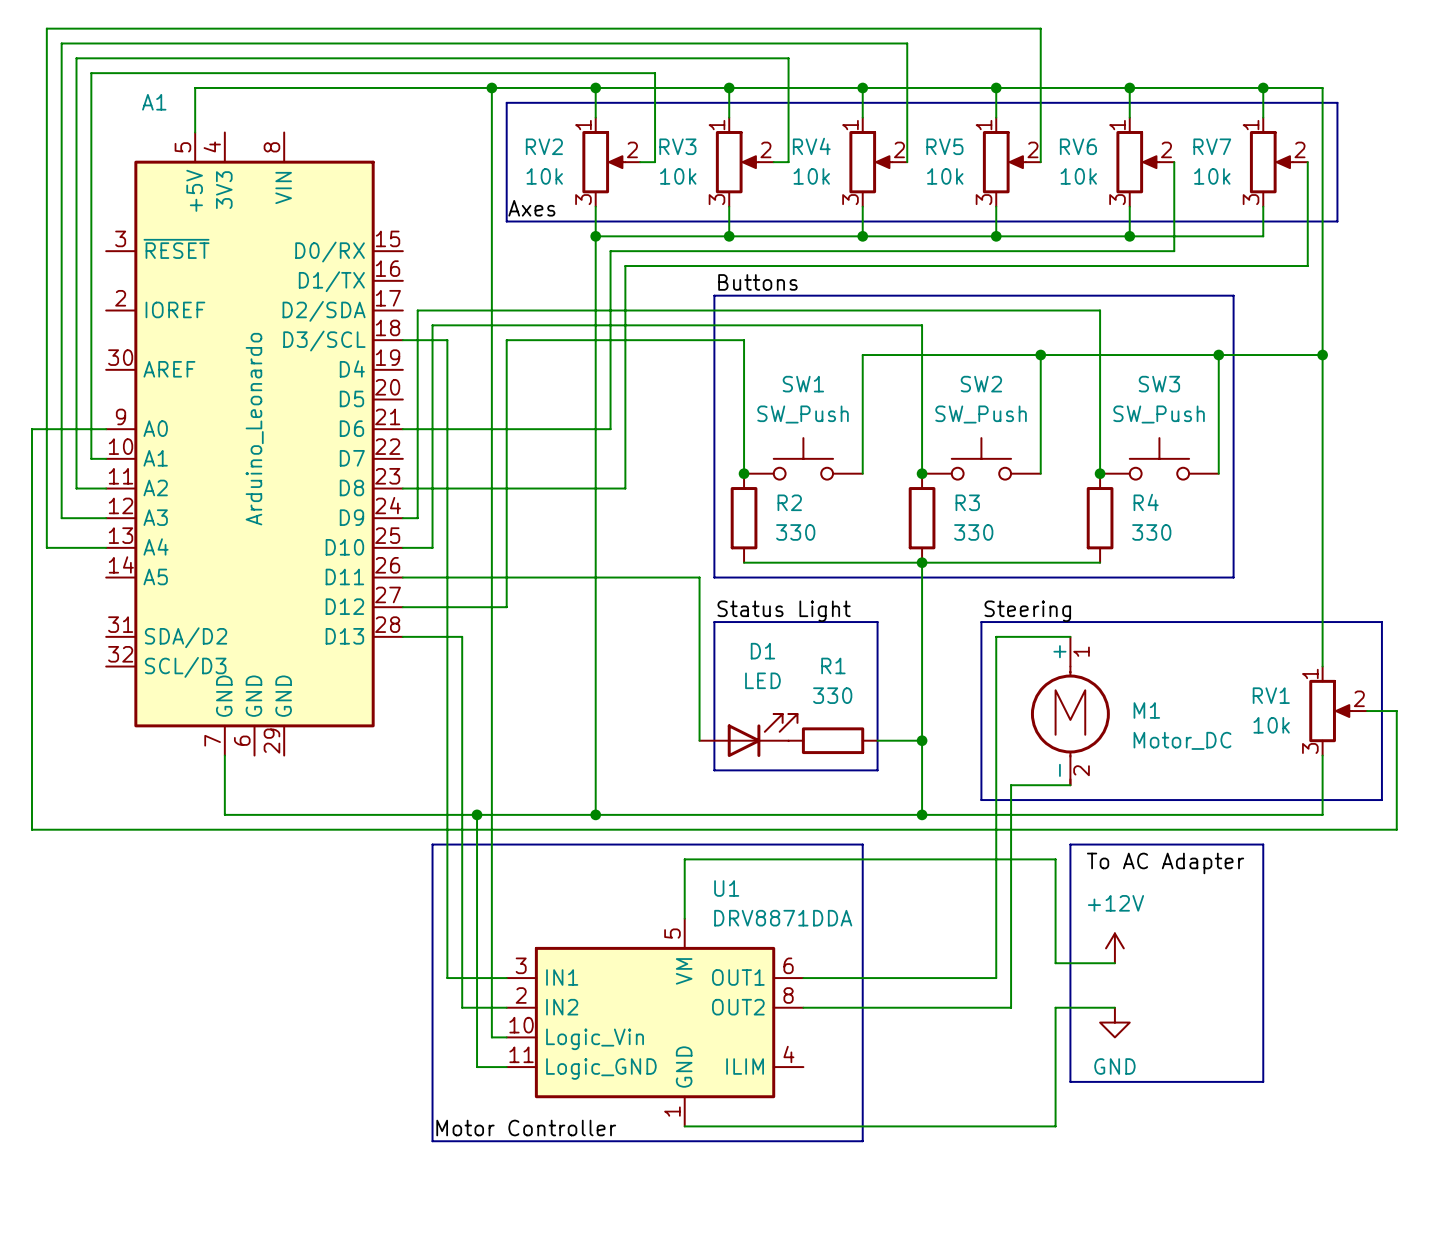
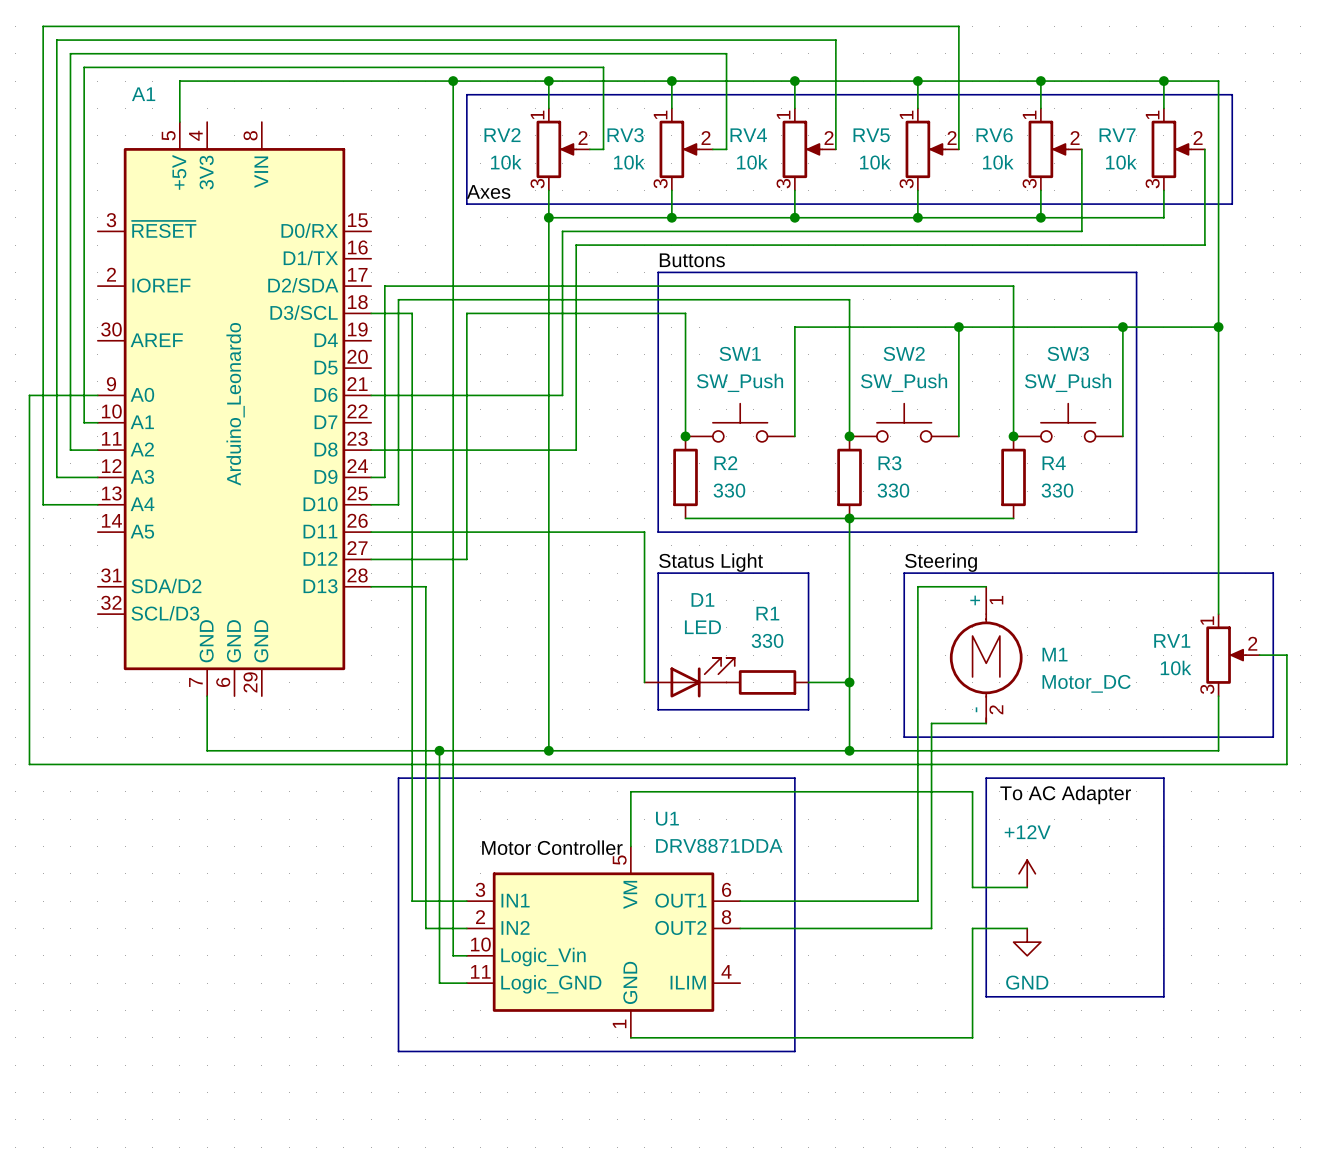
label position: Motor Controller (526, 1128) -> Motor Controller (552, 847)

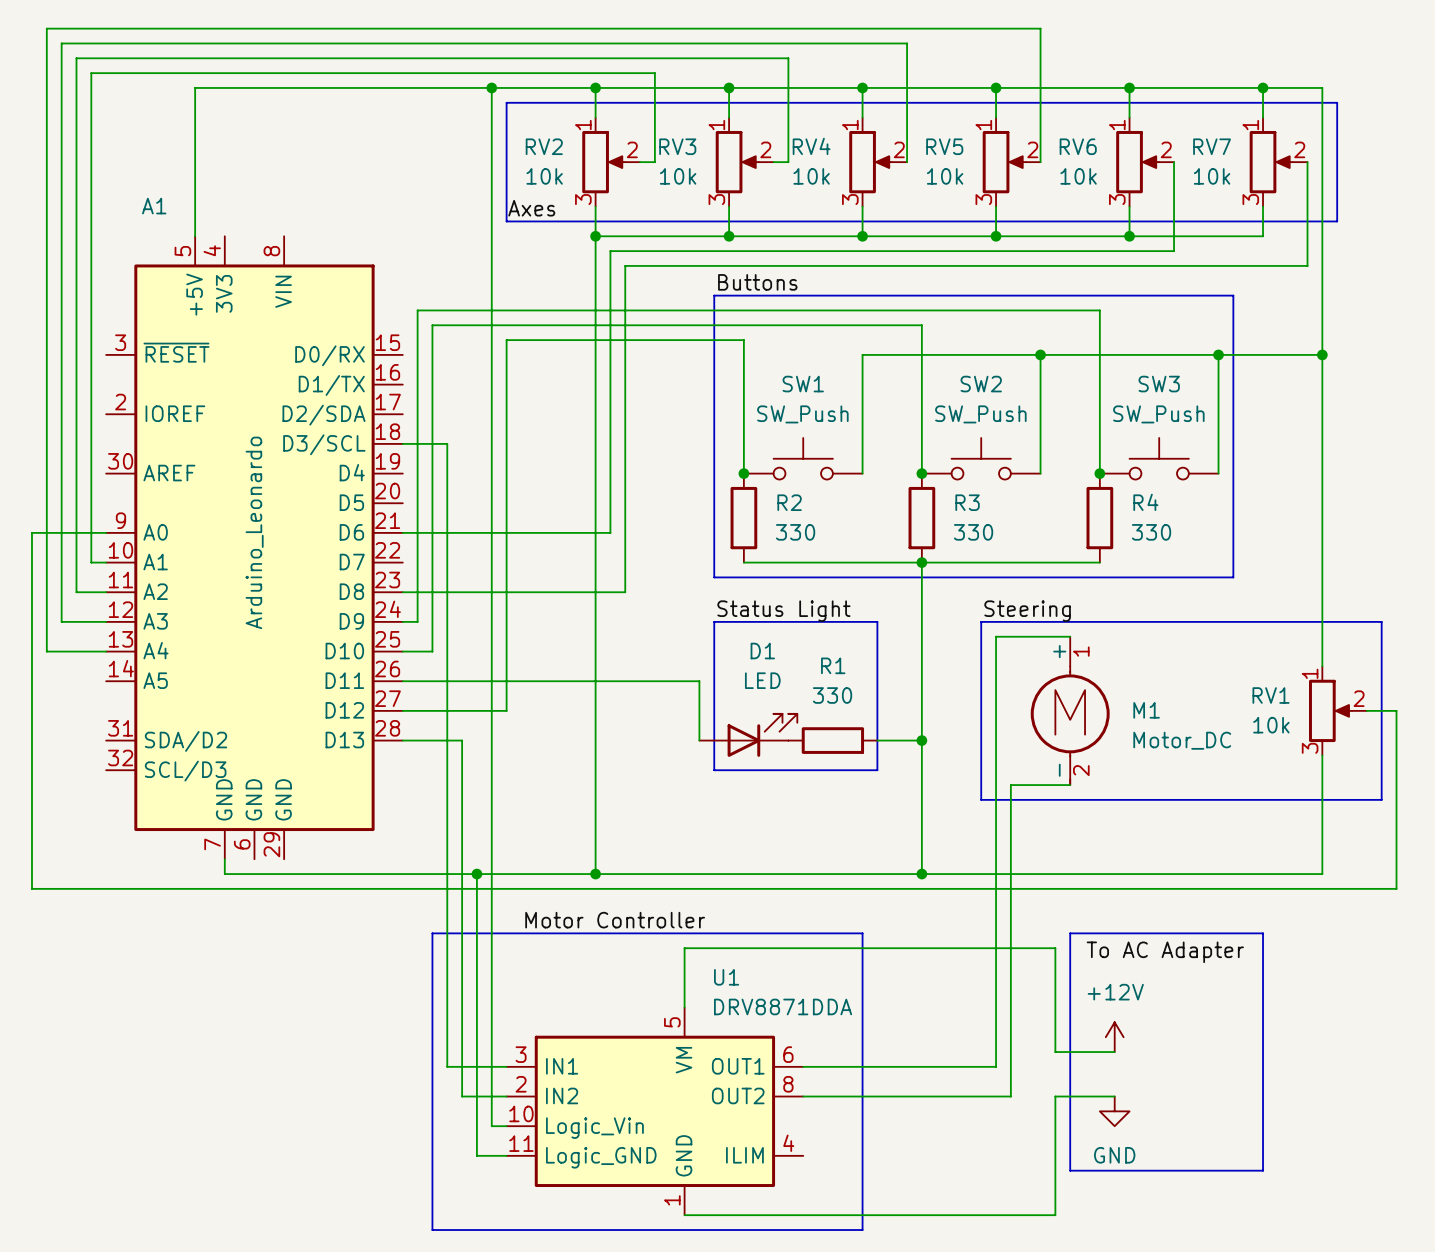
wire: (371, 313) (412, 313) (412, 409) -> (402, 443) (447, 443)
wire: (97, 395) (29, 395) (29, 491) -> (106, 532) (31, 532)
wire: (371, 395) (562, 395) -> (402, 532) (610, 532) (610, 429)
A1 position: (234, 409) -> (254, 547)
wire: (84, 422) (97, 422) -> (91, 458) (91, 562) (106, 562)
wire: (70, 450) (97, 450) -> (76, 488) (76, 592) (106, 592)
wire: (371, 450) (576, 450) -> (402, 592) (625, 592) (625, 488)
wire: (56, 477) (97, 477) -> (61, 518) (61, 621) (106, 621)
wire: (371, 477) (384, 477) -> (402, 621) (417, 621) (417, 518)
wire: (43, 504) (97, 504) -> (46, 547) (46, 651) (106, 651)
wire: (371, 504) (398, 504) -> (402, 651) (432, 651) (432, 547)
wire: (371, 532) (644, 532) (644, 627) -> (402, 681) (699, 681)
wire: (371, 559) (466, 559) -> (402, 710) (506, 710) (506, 607)
wire: (371, 586) (425, 586) (425, 682) -> (402, 740) (462, 740)
wire: (207, 696) (207, 750) (1218, 750) -> (224, 859) (224, 874) (1322, 874) (1322, 814)
wire: (439, 750) (439, 805) -> (595, 814) (595, 874)
junction position: (439, 750) -> (476, 874)
junction position: (548, 750) -> (595, 874)
wire: none -> (921, 814) (921, 874)
junction position: (849, 750) -> (921, 874)
wire: (29, 764) (1286, 764) -> (31, 829) (31, 888) (1396, 888) (1396, 829)
label position: To AC Adapter (1065, 794) -> To AC Adapter (1165, 952)
wire: (630, 846) (630, 791) (972, 791) (972, 873) -> (684, 1007) (684, 948) (1055, 948)
line: (398, 860) (398, 778) (794, 778) (794, 860) -> (432, 933) (862, 933)
line: (986, 860) (986, 778) (1163, 778) (1163, 860) -> (1070, 933) (1263, 933)
power symbol position: +12V (1027, 873) -> +12V (1114, 1037)
wire: (972, 887) (1027, 887) -> (1055, 963) (1055, 1007)
wire: (412, 901) (466, 901) -> (447, 977) (447, 1066) (476, 1066) (476, 1155) (506, 1155)
wire: (740, 901) (917, 901) -> (803, 1066) (996, 1066) (996, 977)
wire: (425, 928) (466, 928) -> (462, 1007) (462, 1096) (506, 1096)
wire: (740, 928) (931, 928) -> (803, 1096) (1010, 1096) (1010, 1007)
wire: (972, 928) (1027, 928) -> (1055, 1096) (1114, 1096)
U1 position: (603, 942) -> (654, 1111)
power symbol position: GND (1027, 942) -> GND (1114, 1111)
wire: (453, 955) (466, 955) -> (491, 1037) (491, 1126) (506, 1126)
wire: (972, 969) (972, 1010) -> (1055, 1052) (1114, 1052)
line: (986, 996) (1163, 996) -> (1070, 1081) (1070, 1170) (1263, 1170) (1263, 1081)
wire: (630, 1037) (972, 1037) -> (684, 1215) (1055, 1215) (1055, 1126)
line: (398, 1051) (794, 1051) -> (432, 1141) (432, 1230) (862, 1230) (862, 1141)

